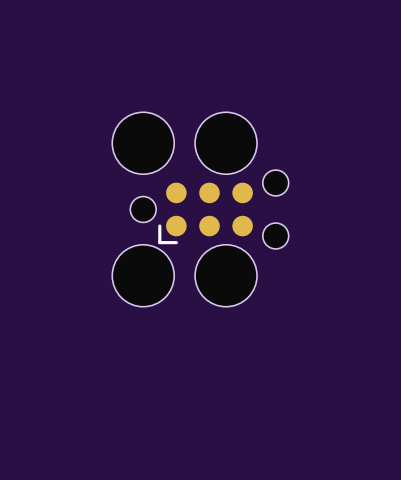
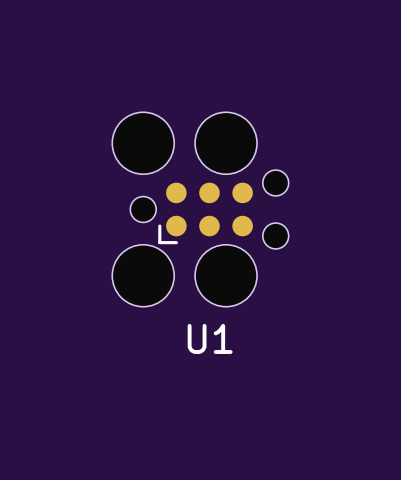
U1 name: none -> U1 (210, 338)

